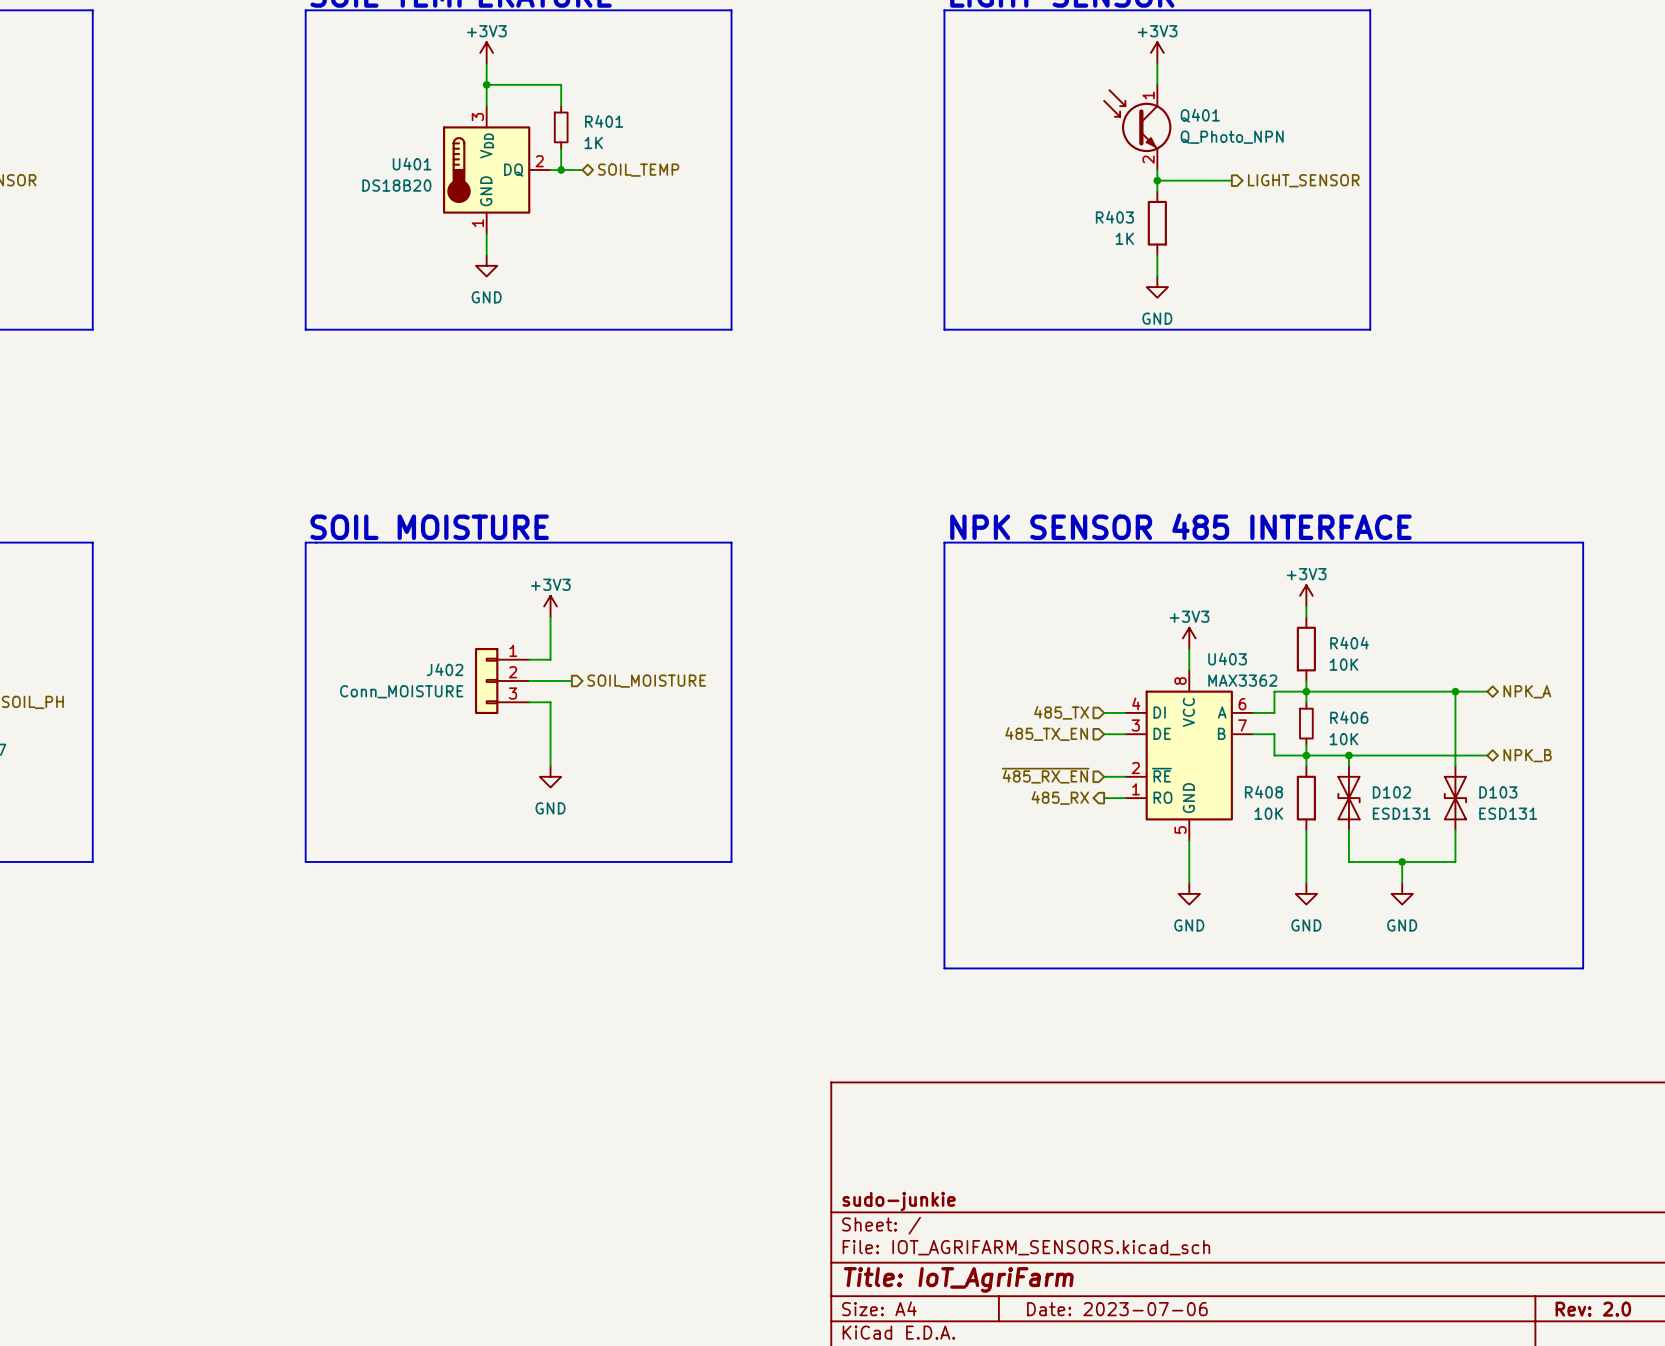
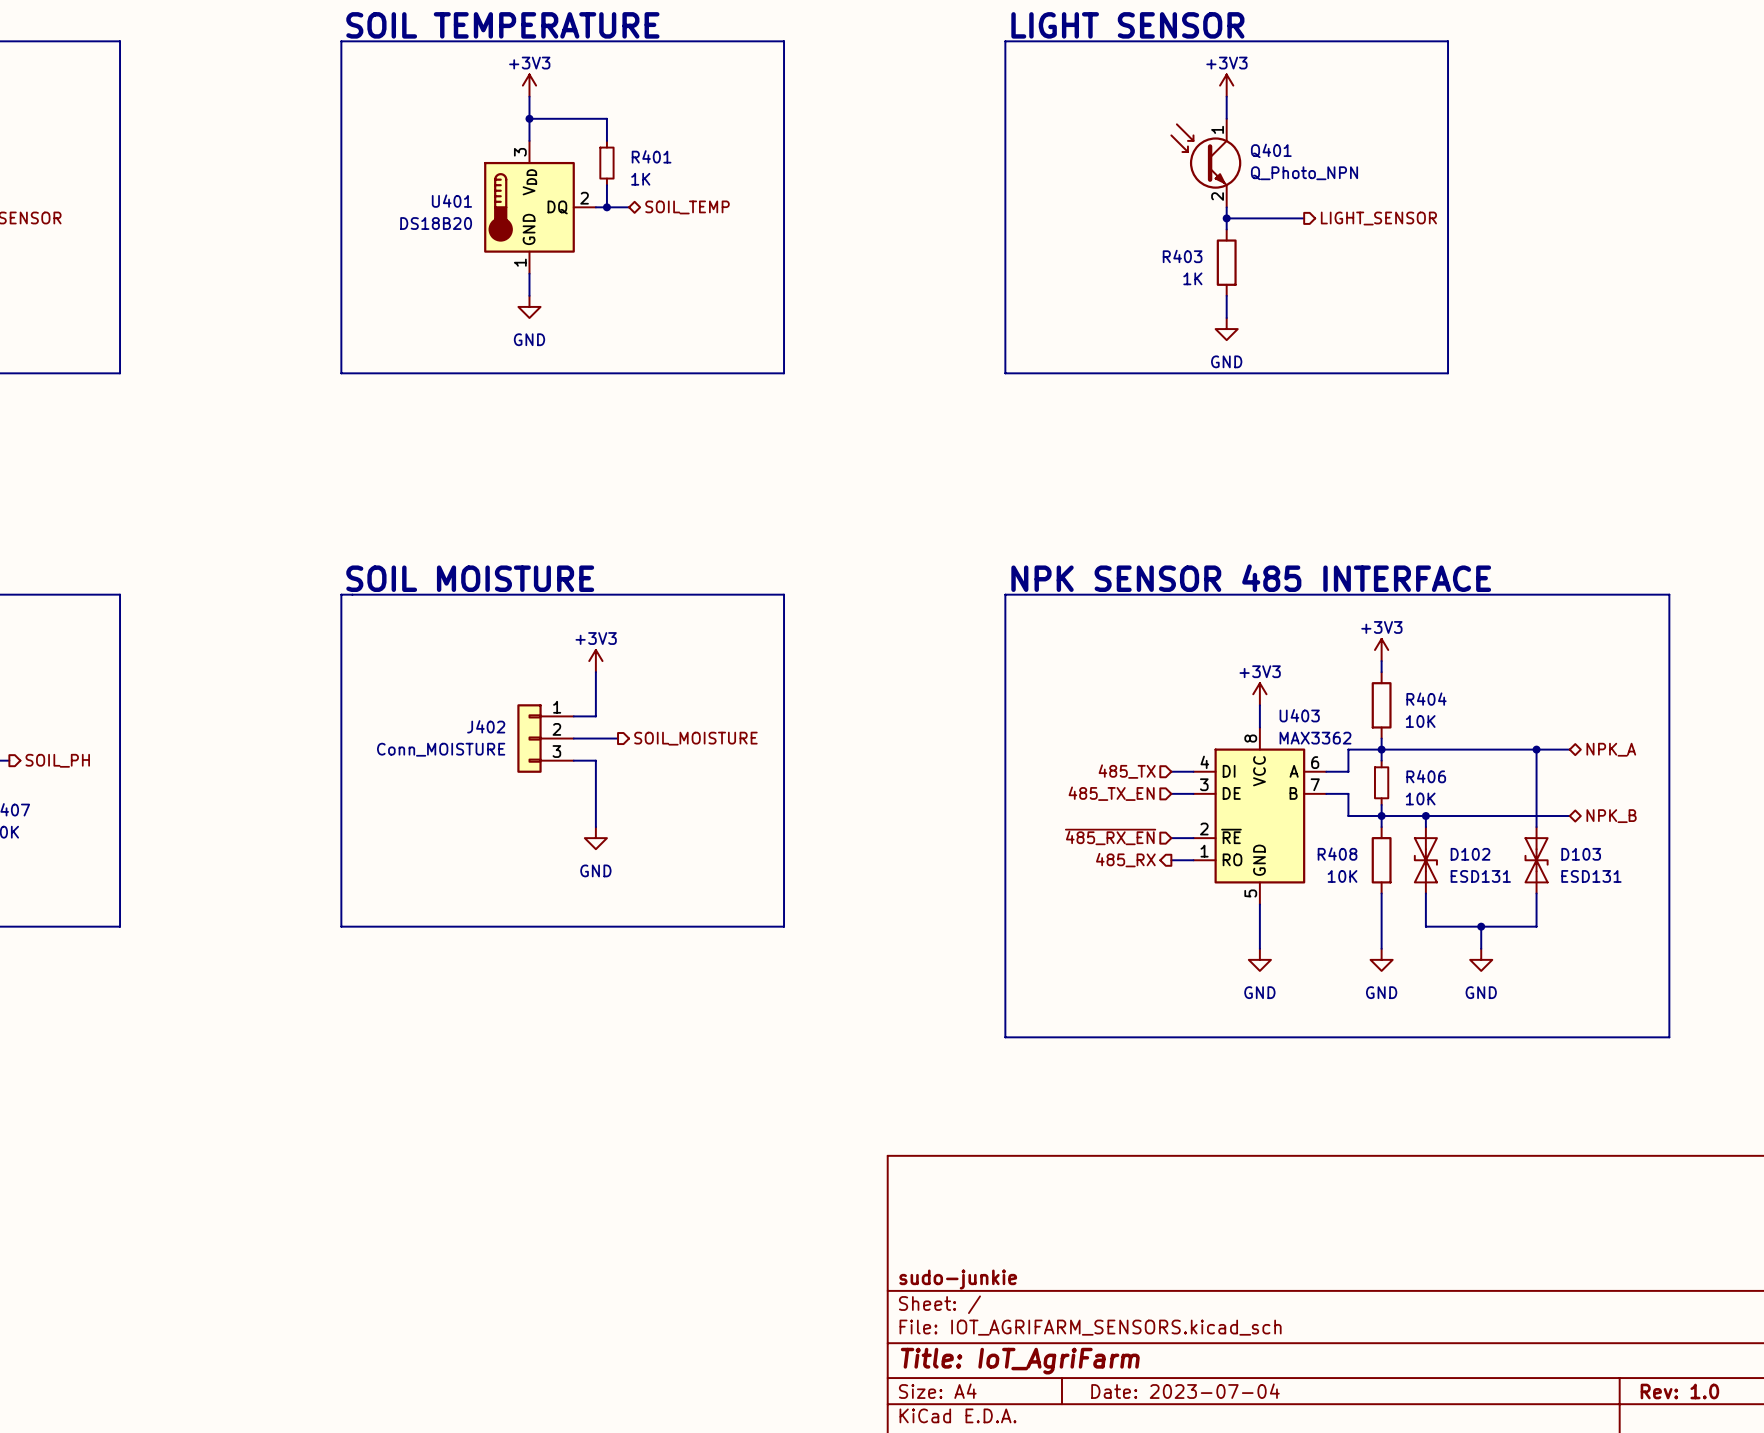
title block: Date: 2023-07-06 (1117, 1309) -> Date: 2023-07-04 (1185, 1391)
title block: Rev: 2.0 (1593, 1309) -> Rev: 1.0 (1679, 1391)

